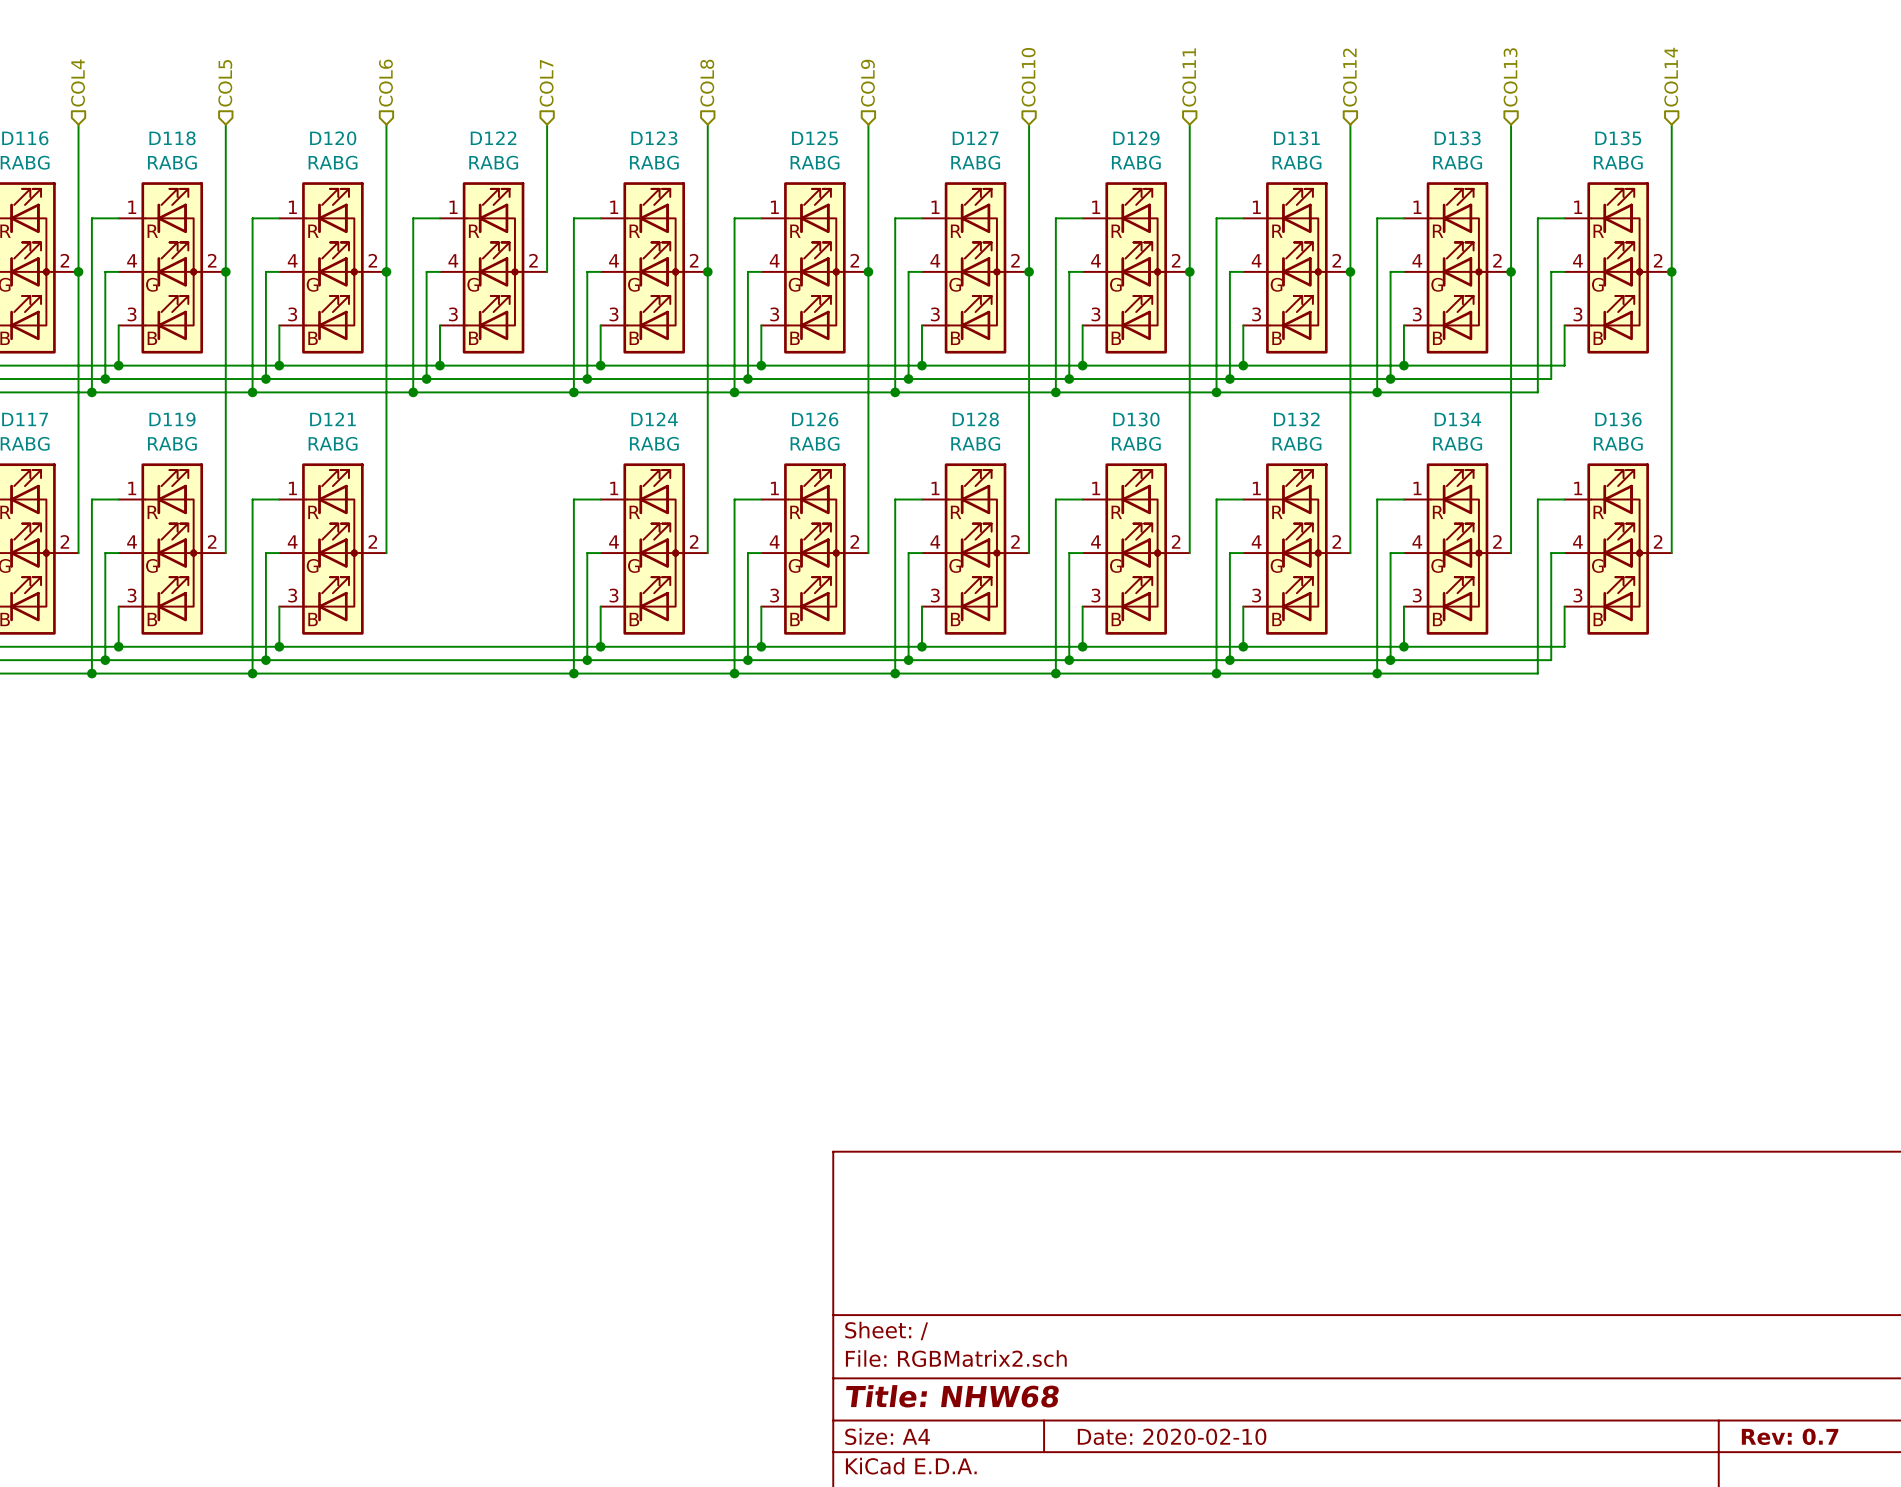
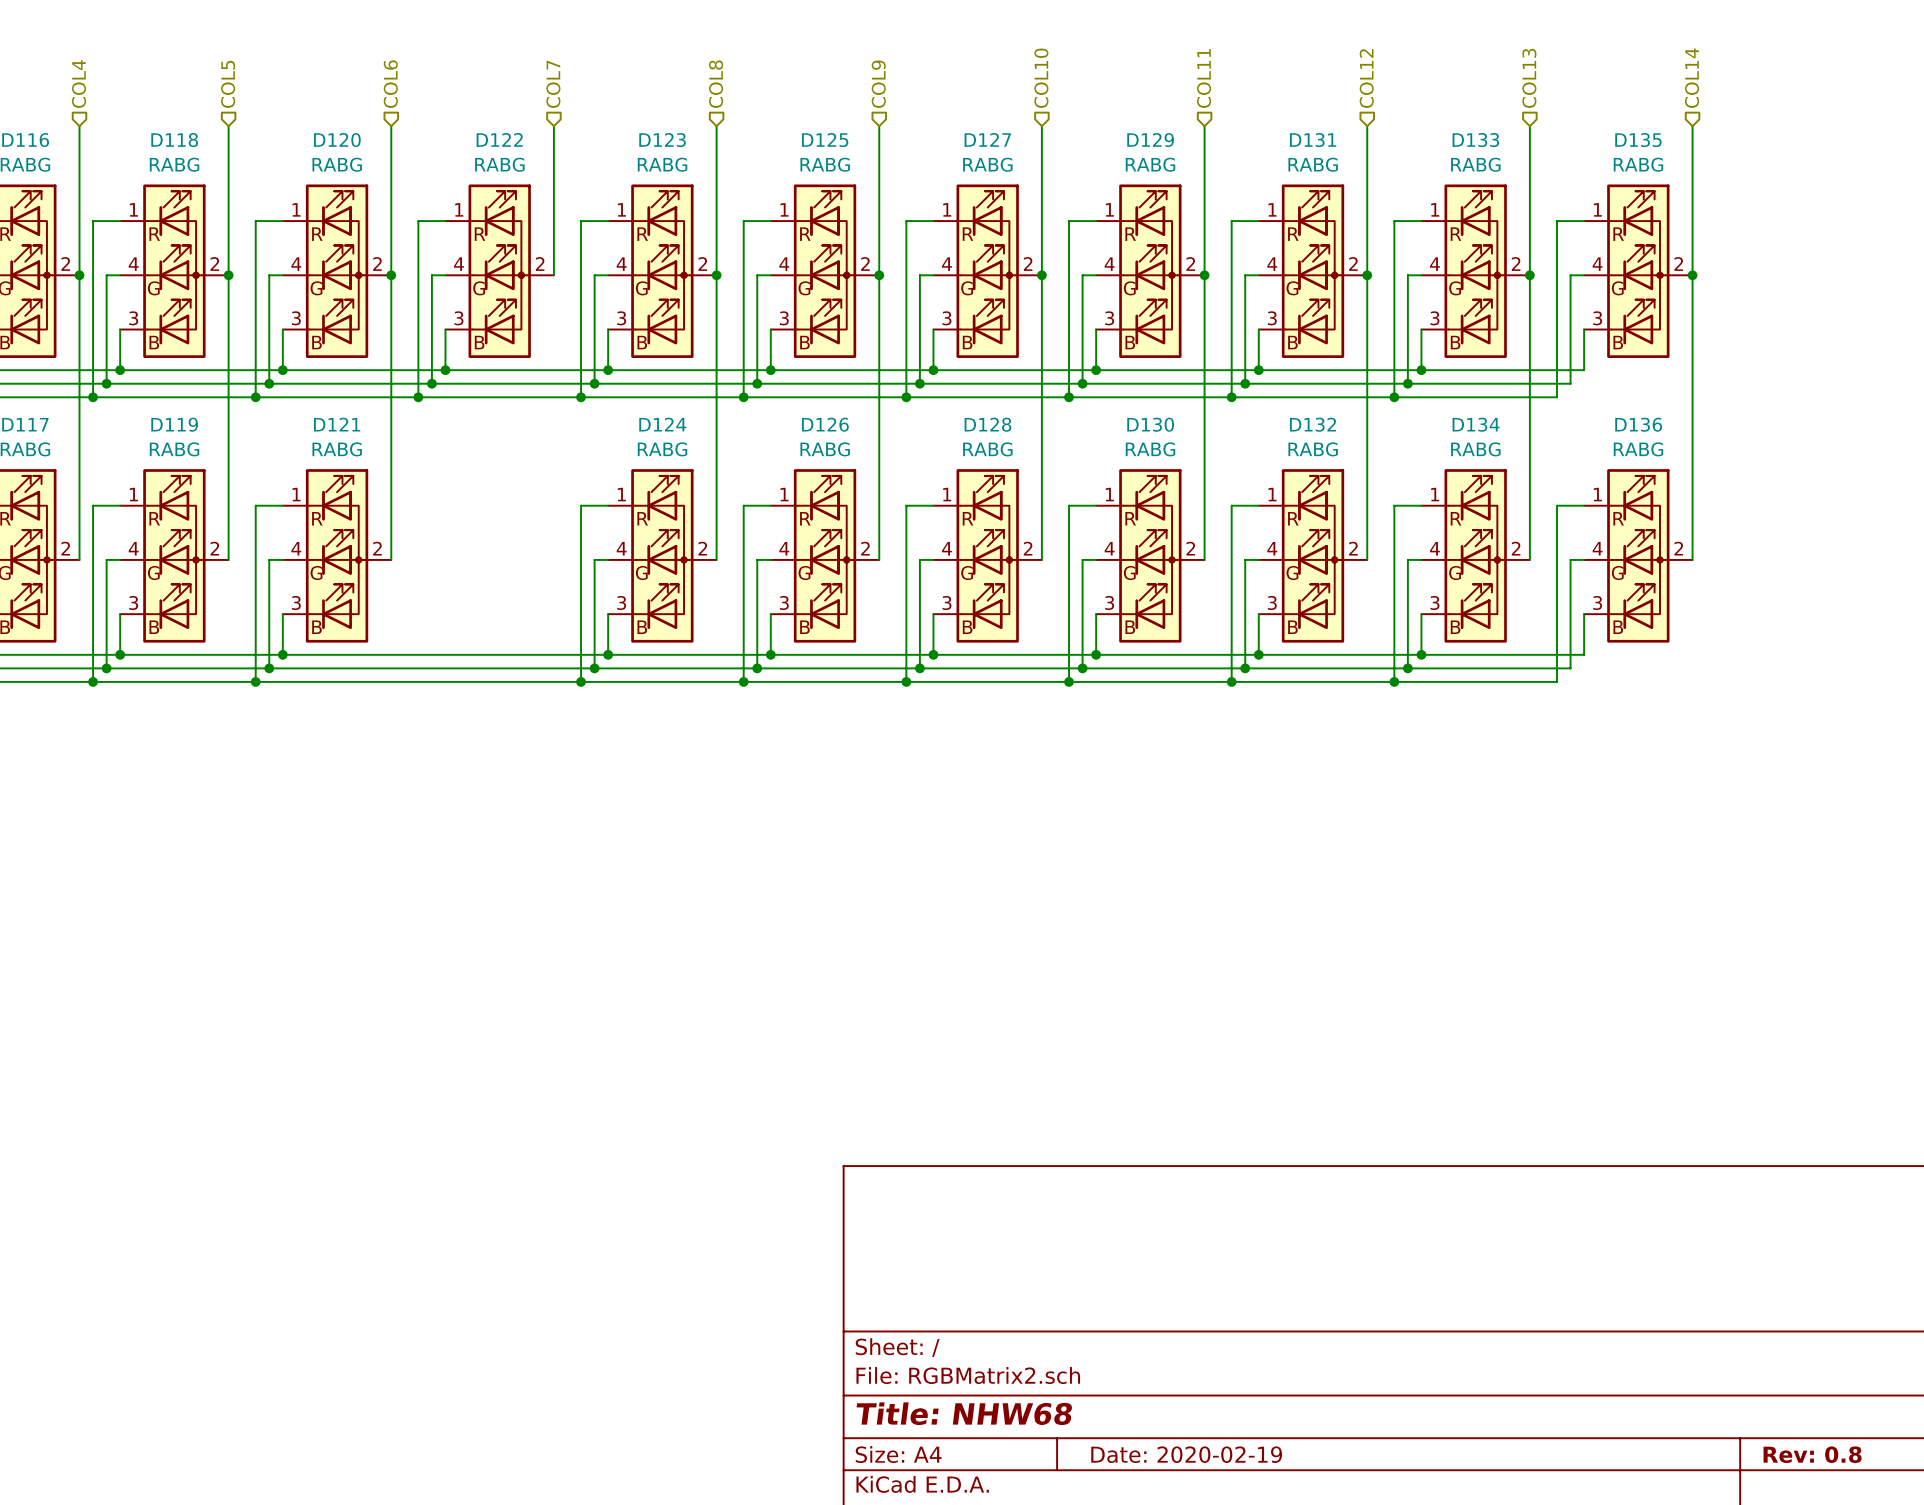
title block: Date: 2020-02-10 (1172, 1436) -> Date: 2020-02-19 (1186, 1454)
title block: Rev: 0.7 (1790, 1436) -> Rev: 0.8 (1812, 1454)

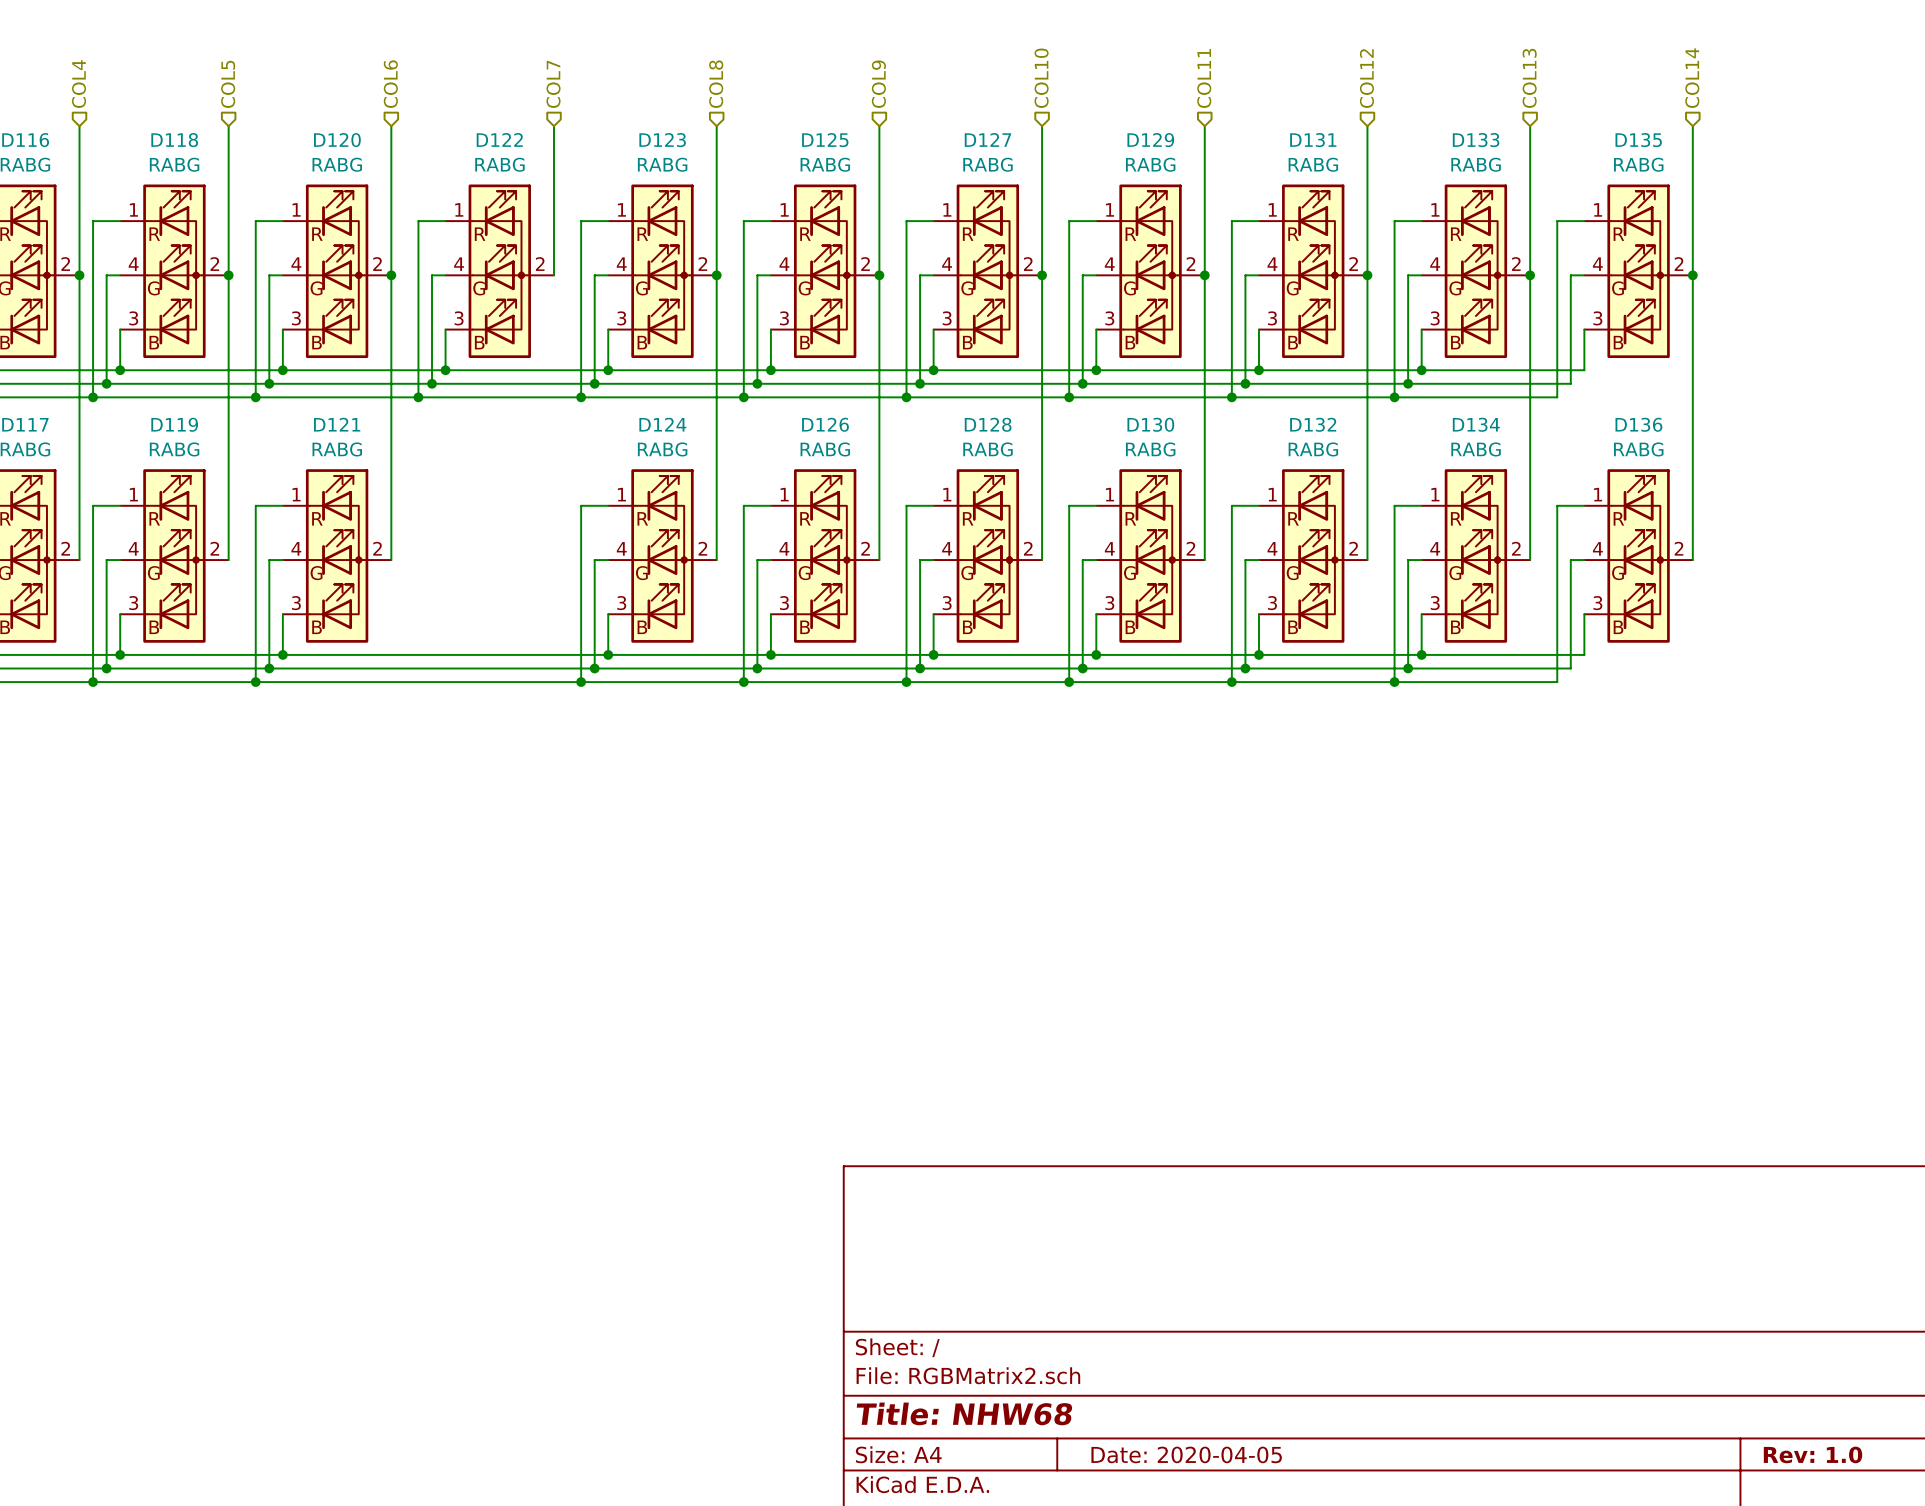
title block: Date: 2020-02-19 (1186, 1454) -> Date: 2020-04-05 (1186, 1454)
title block: Rev: 0.8 (1812, 1454) -> Rev: 1.0 (1813, 1454)

